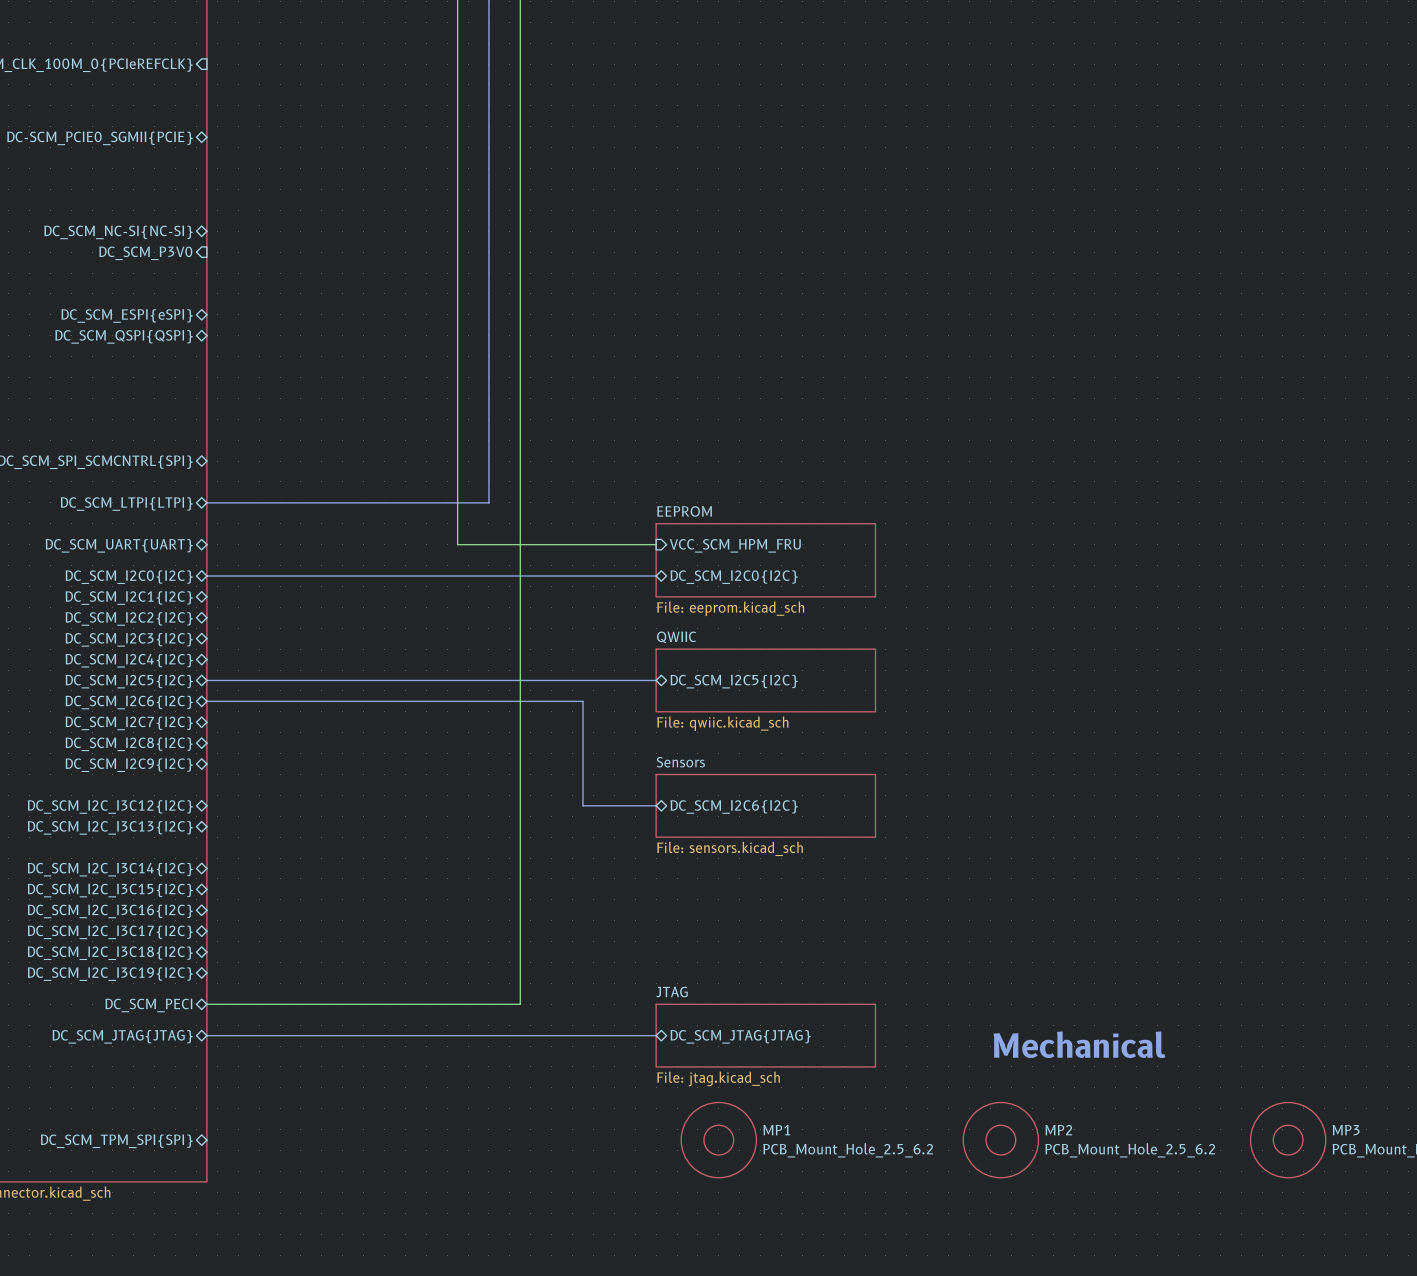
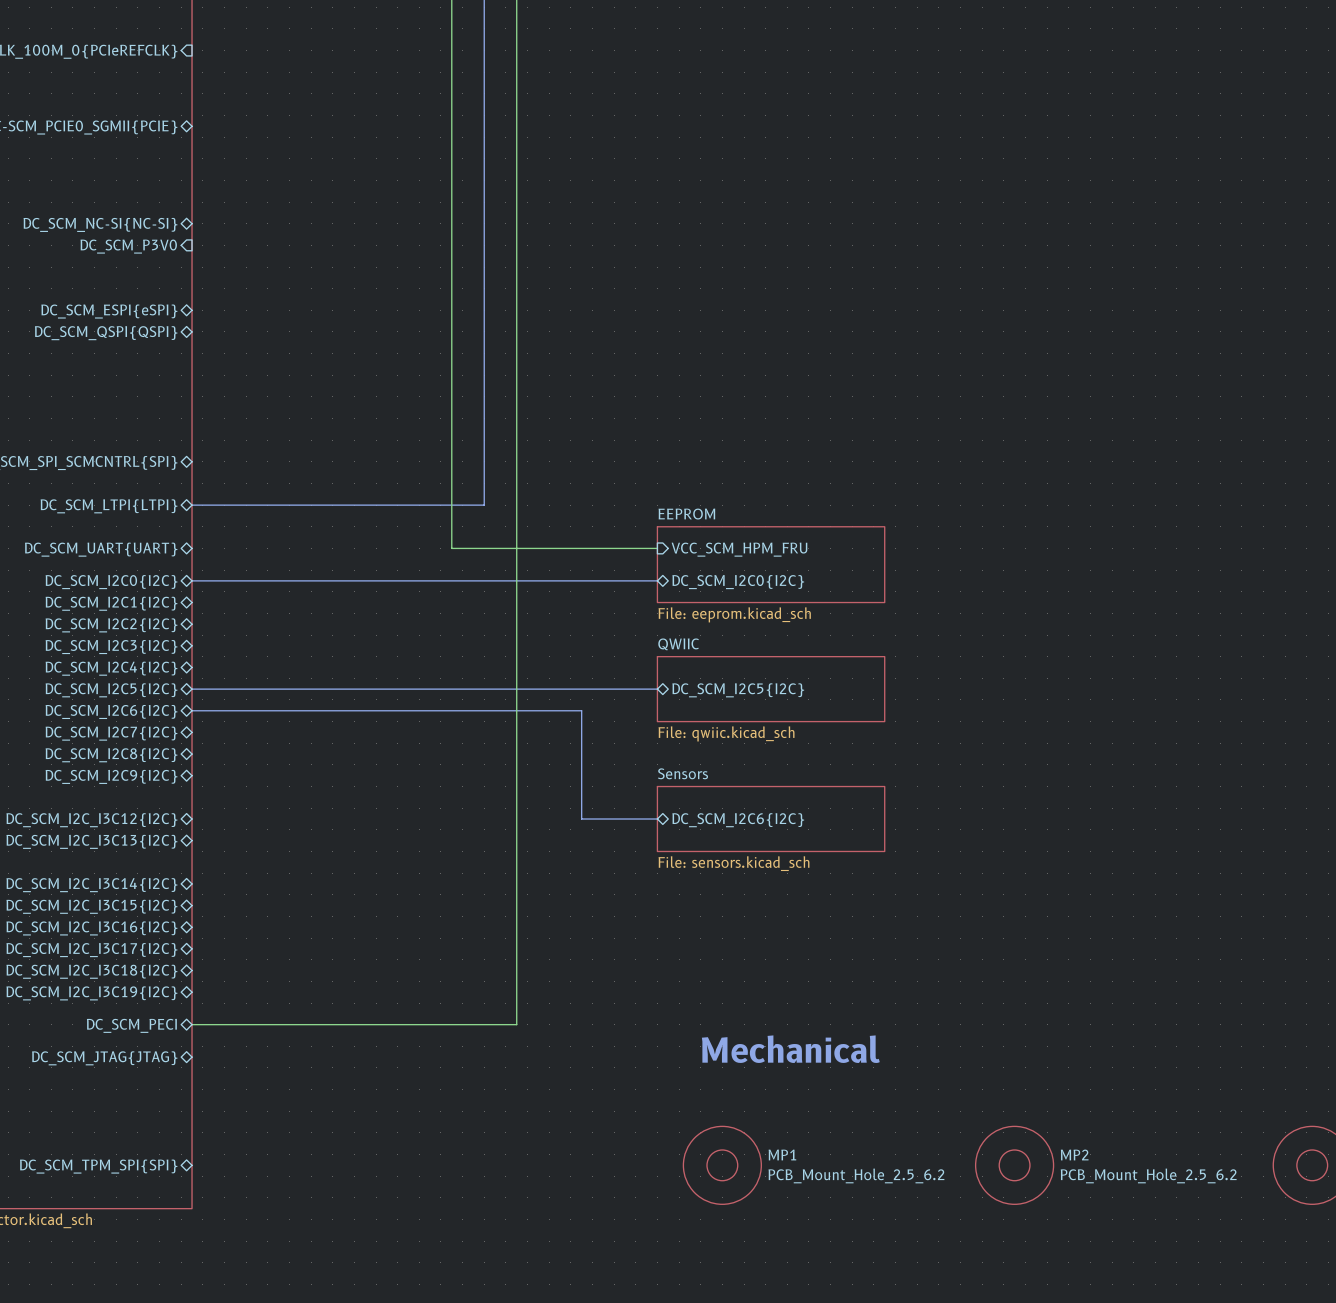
text: none -> Mechanical (790, 1049)
bus: (206, 1035) (656, 1035) -> none
sheet JTAG: File: jtag.kicad_sch (765, 1035) -> none
sheet pin: DC_SCM_JTAG{JTAG} (740, 1036) -> none
text: Mechanical (1079, 1044) -> none

